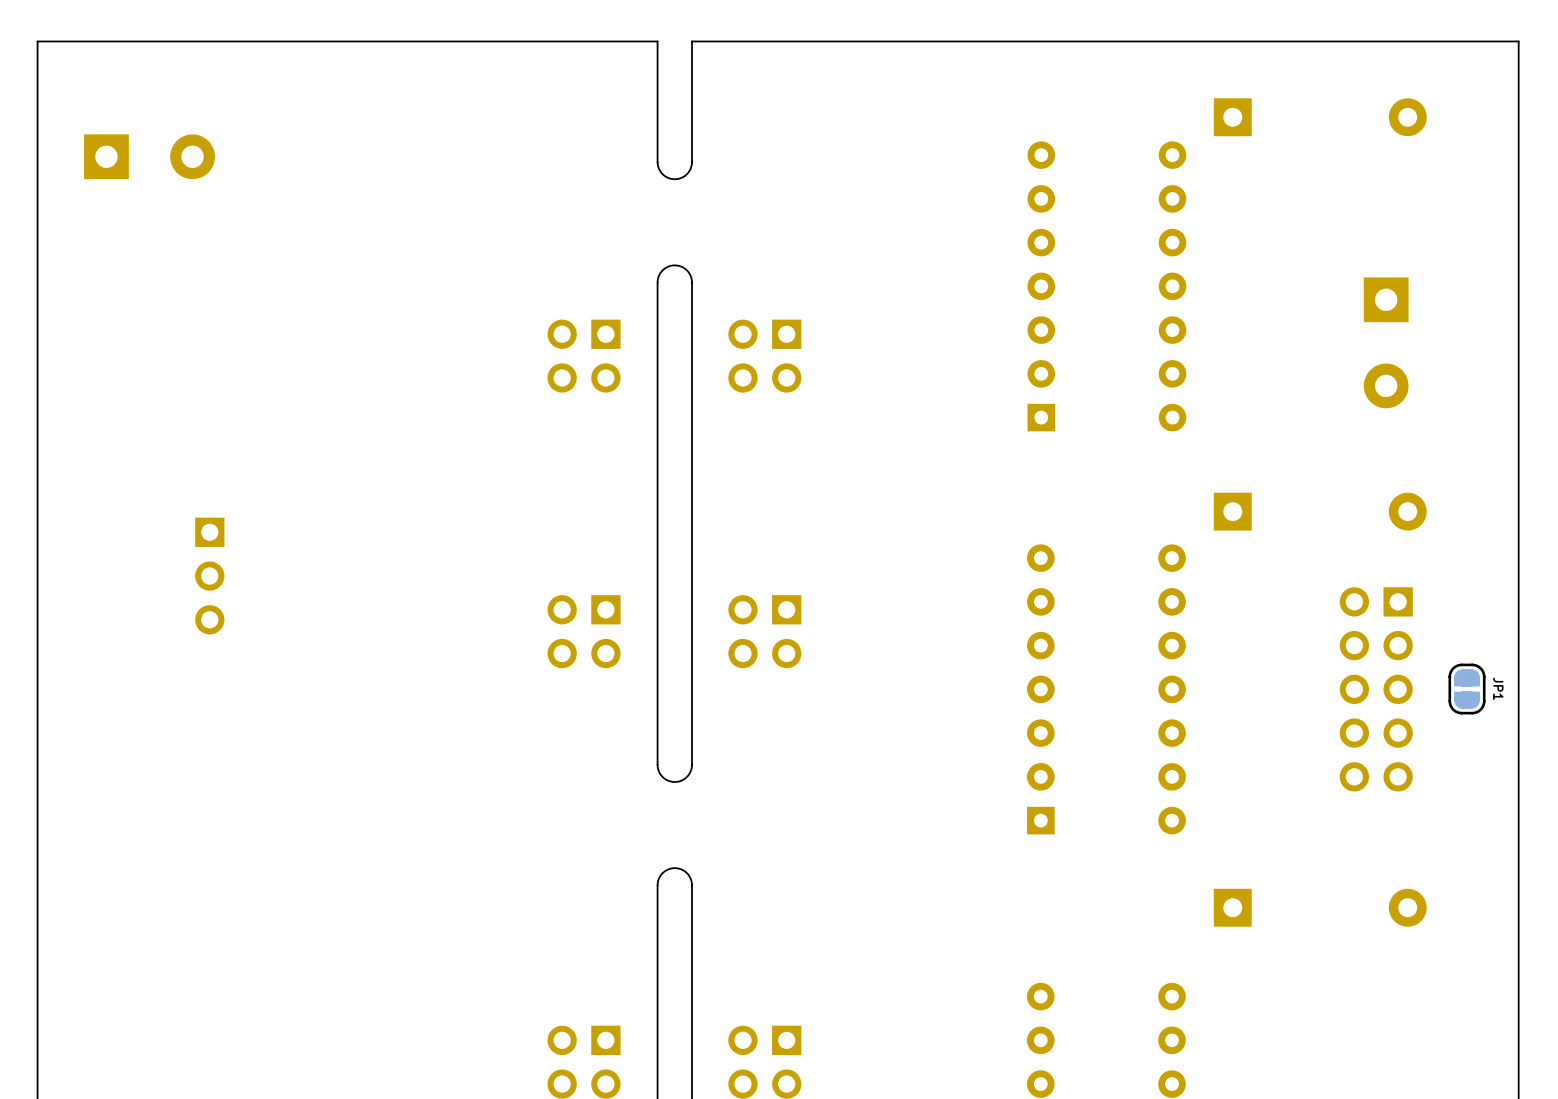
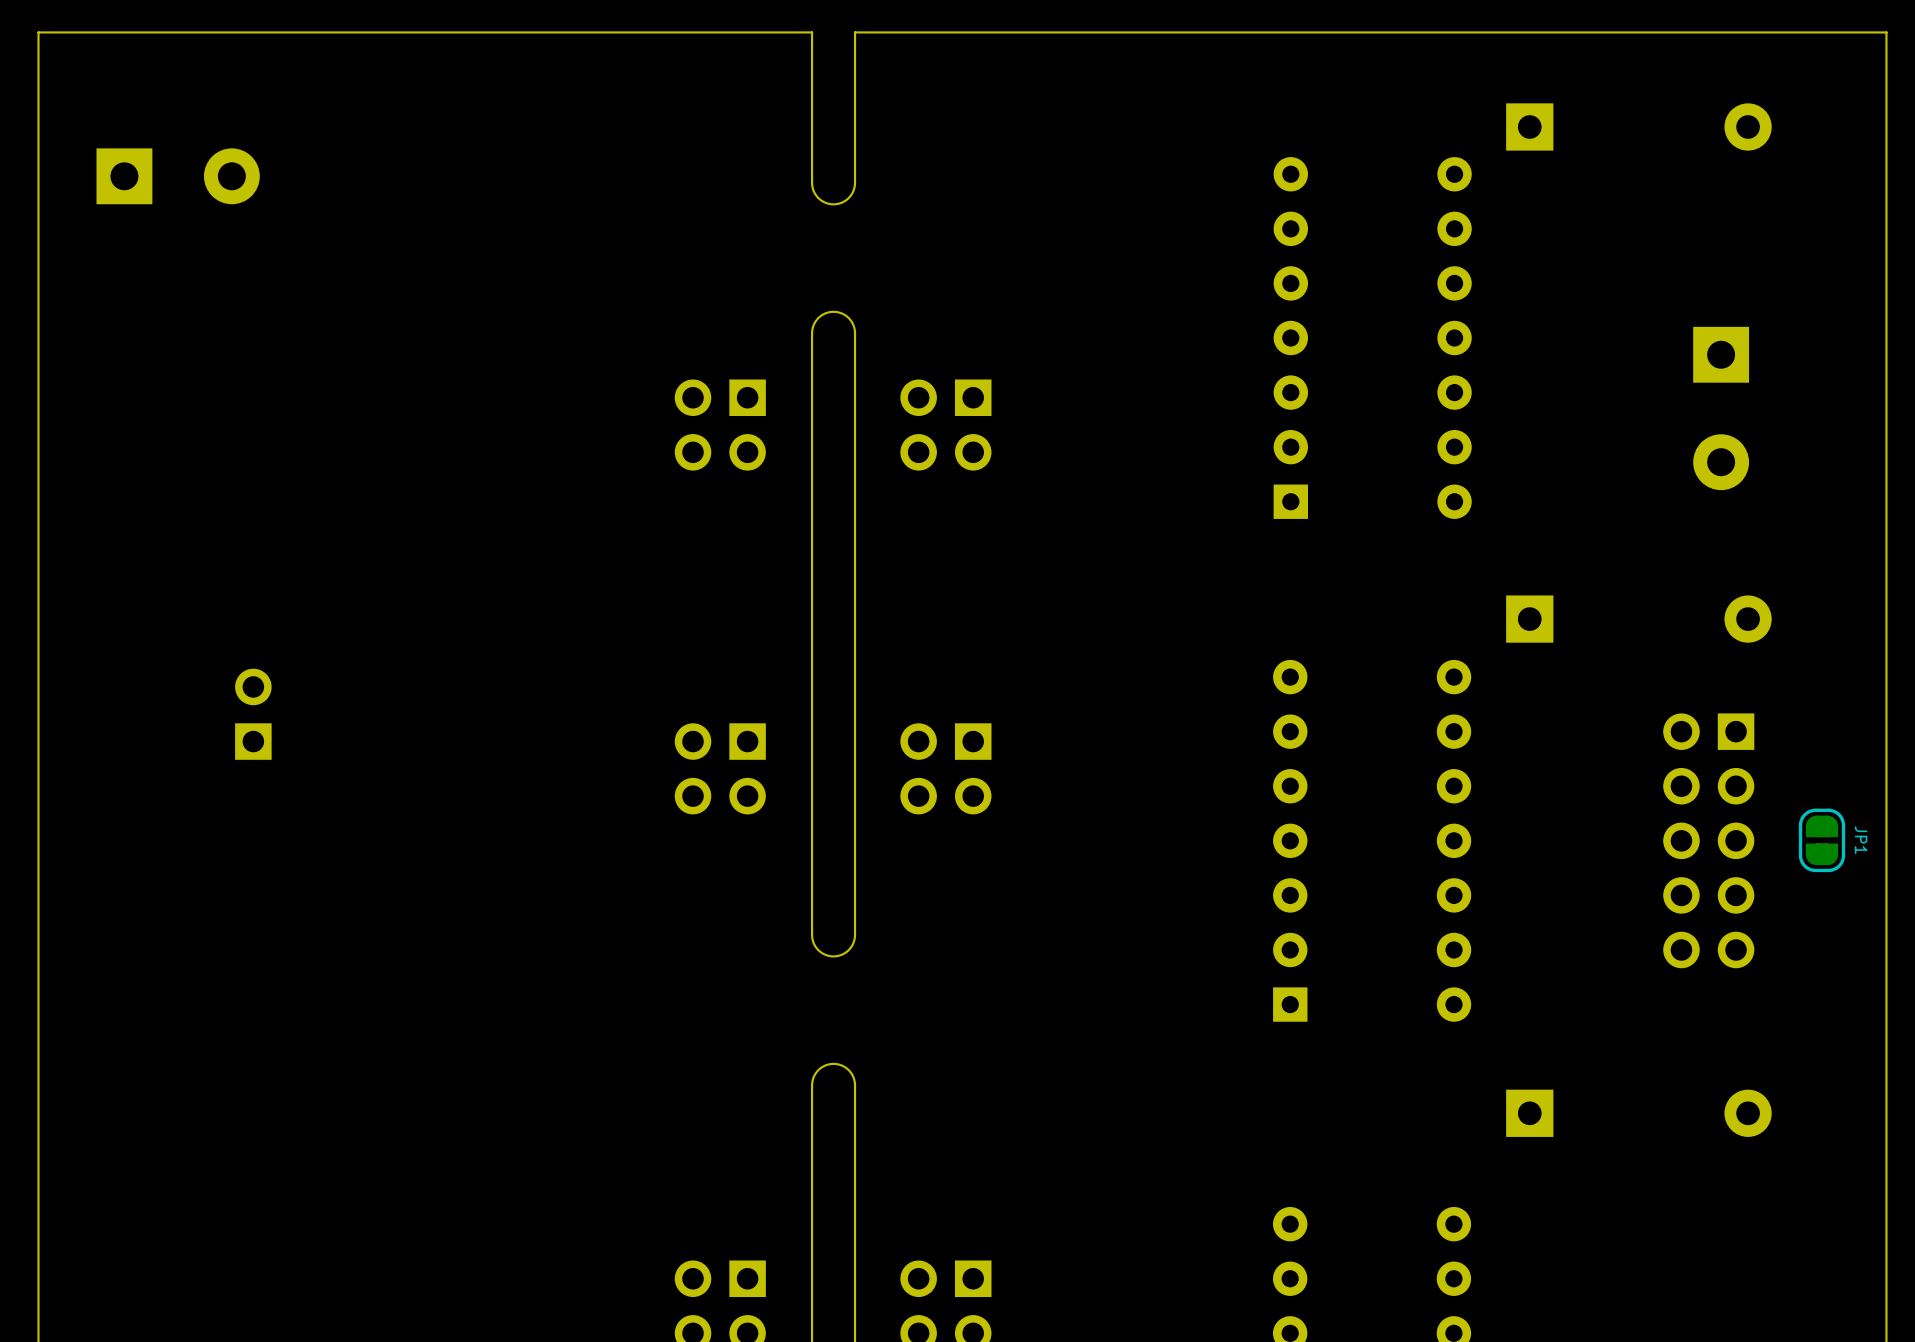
part footprint: [195, 517, 225, 635] -> [235, 668, 272, 760]

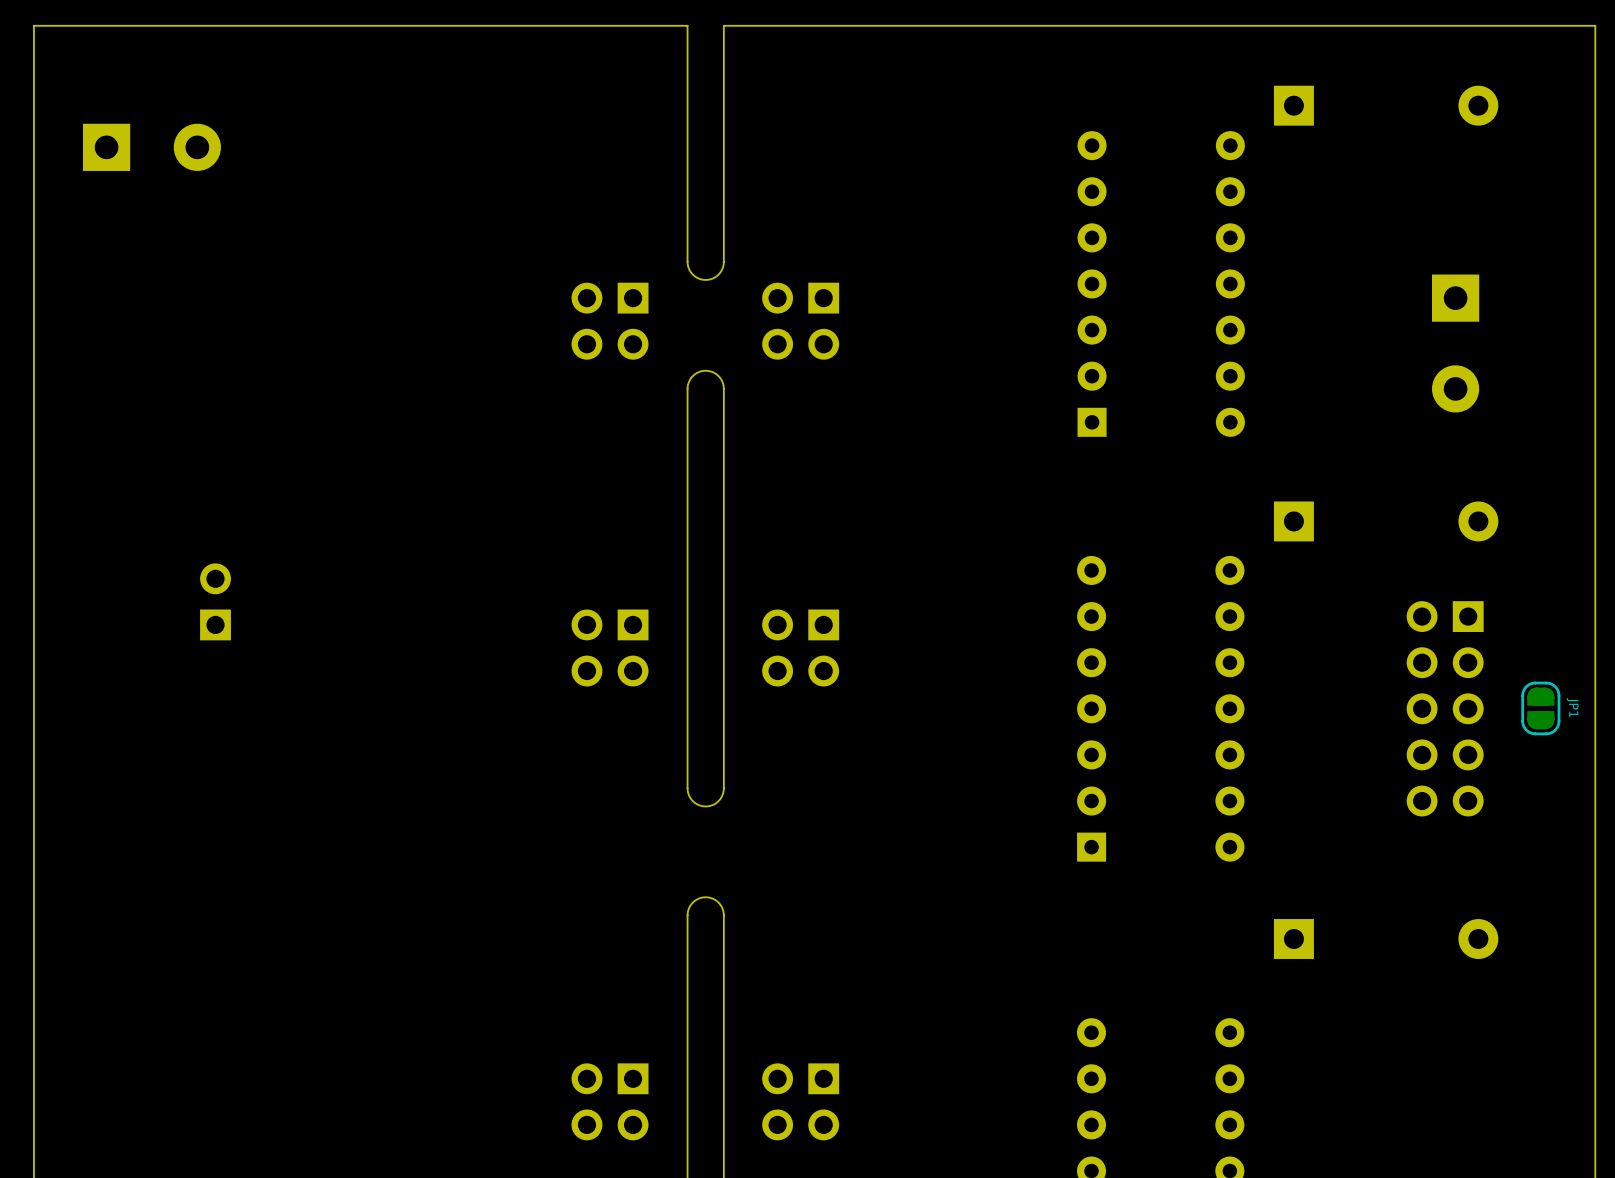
board edge: (855, 182) (853, 191) (848, 198) (841, 202) (833, 204) (825, 202) (818, 198) (813, 191) (812, 182) -> (723, 152) (723, 264) (718, 274) (705, 279) (692, 274) (687, 264) (687, 152)
part position: (720, 425) -> (610, 321)
part position: (945, 425) -> (800, 321)
board edge: (855, 462) (854, 330) (848, 318) (841, 313) (833, 311) (825, 313) (818, 318) (812, 330) (812, 462) -> (723, 388) (718, 376) (705, 370) (692, 376) (687, 388)

